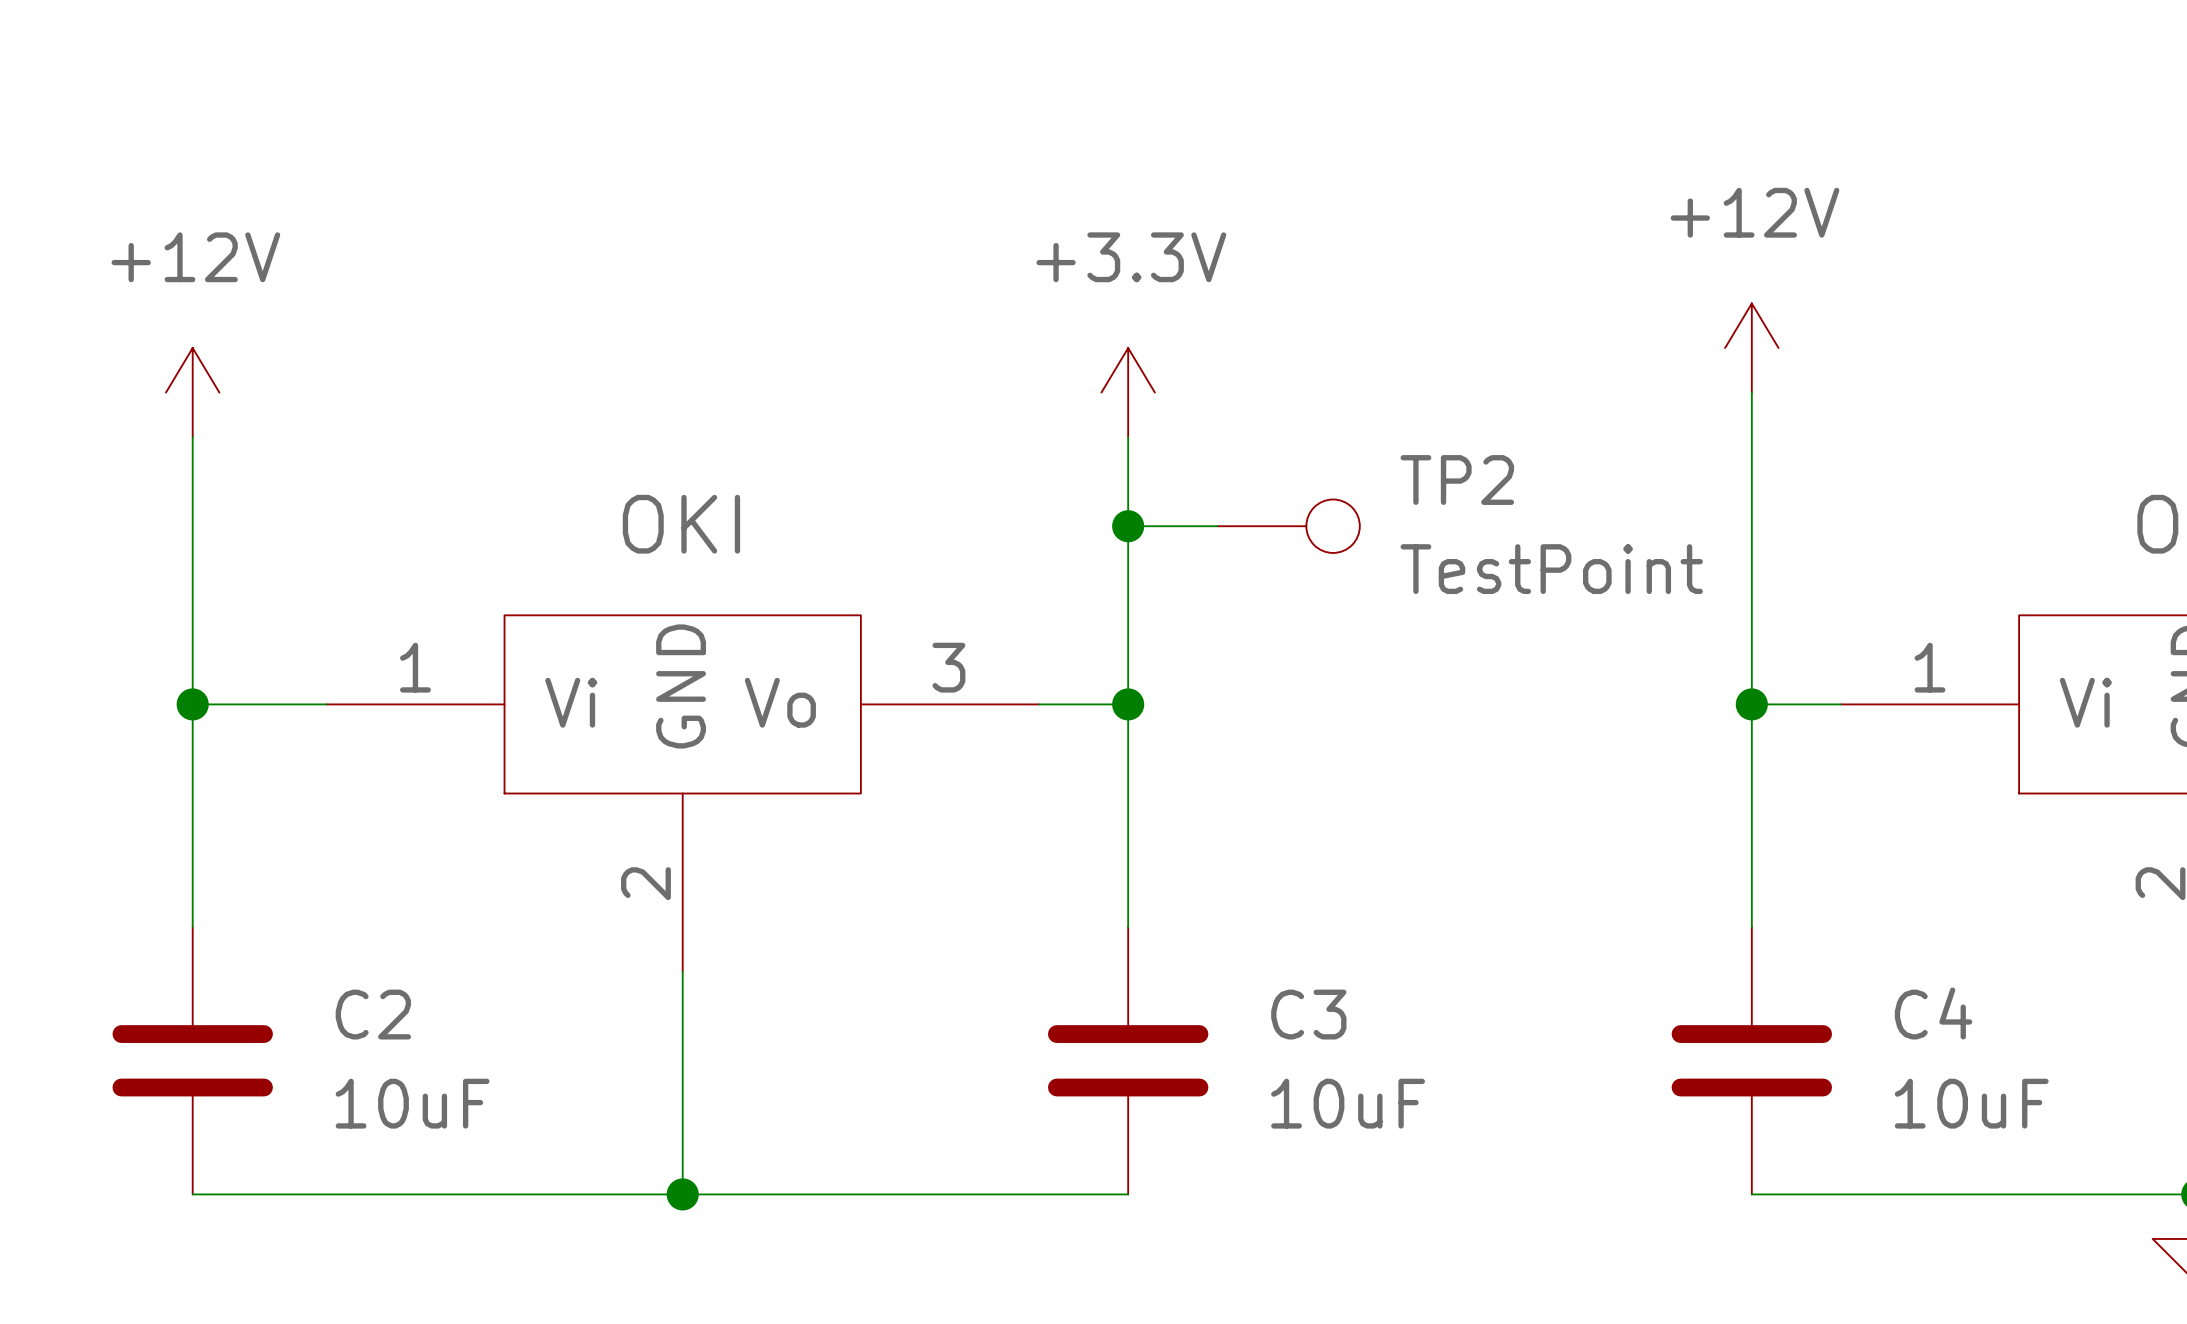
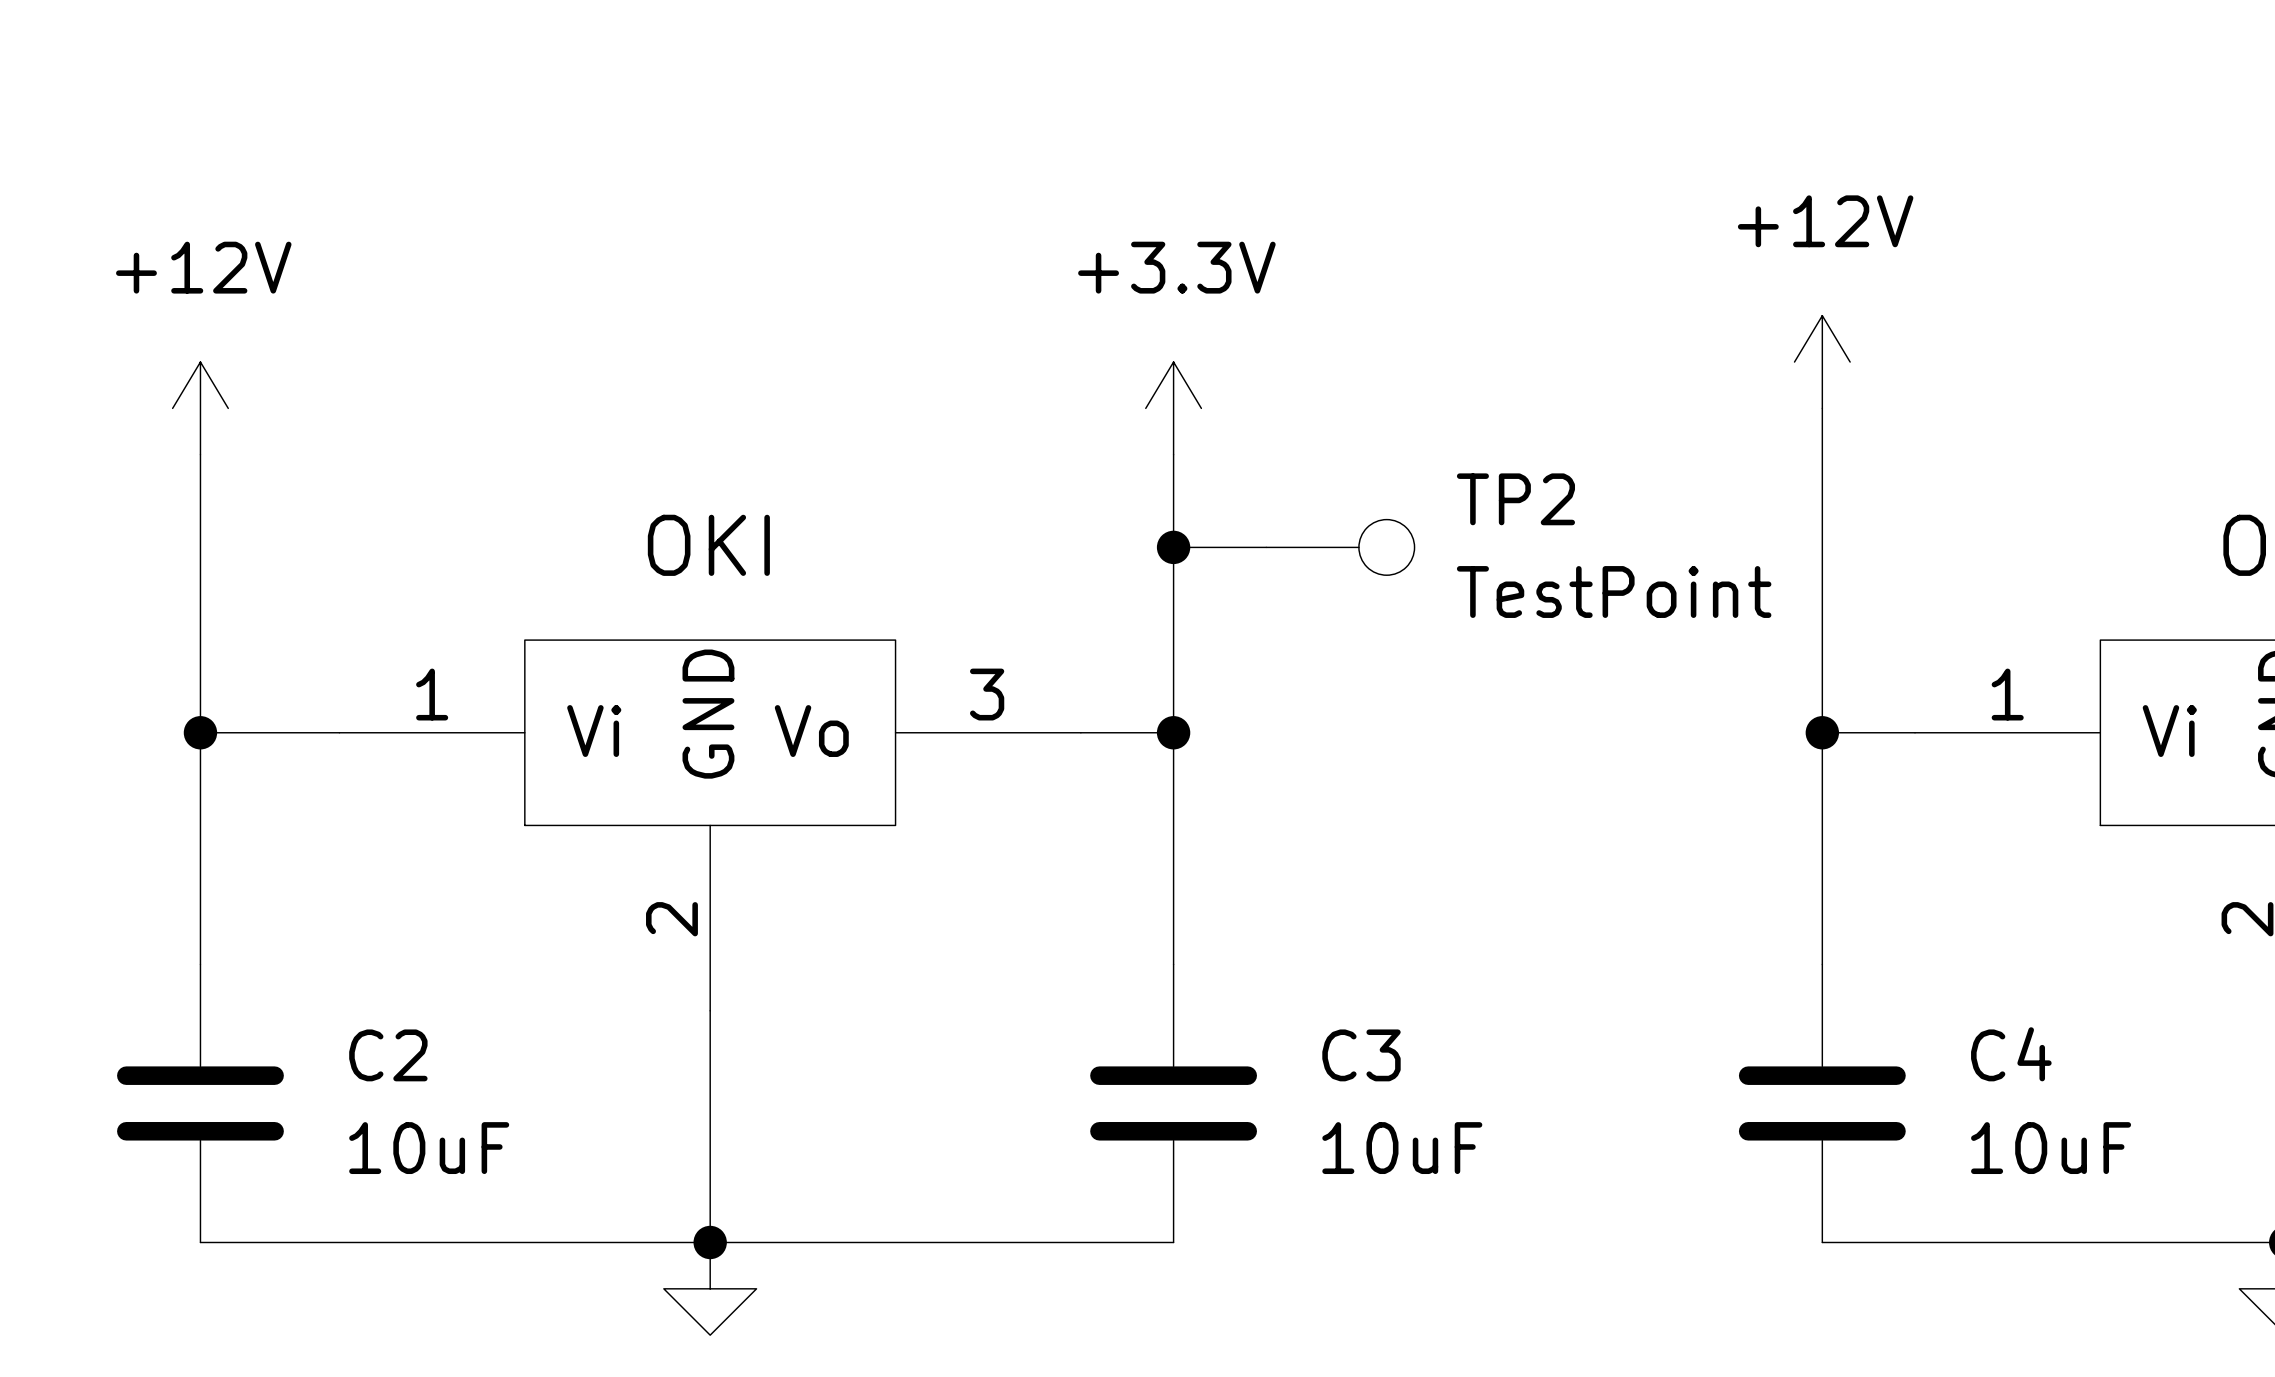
power symbol: none -> (710, 1288)

